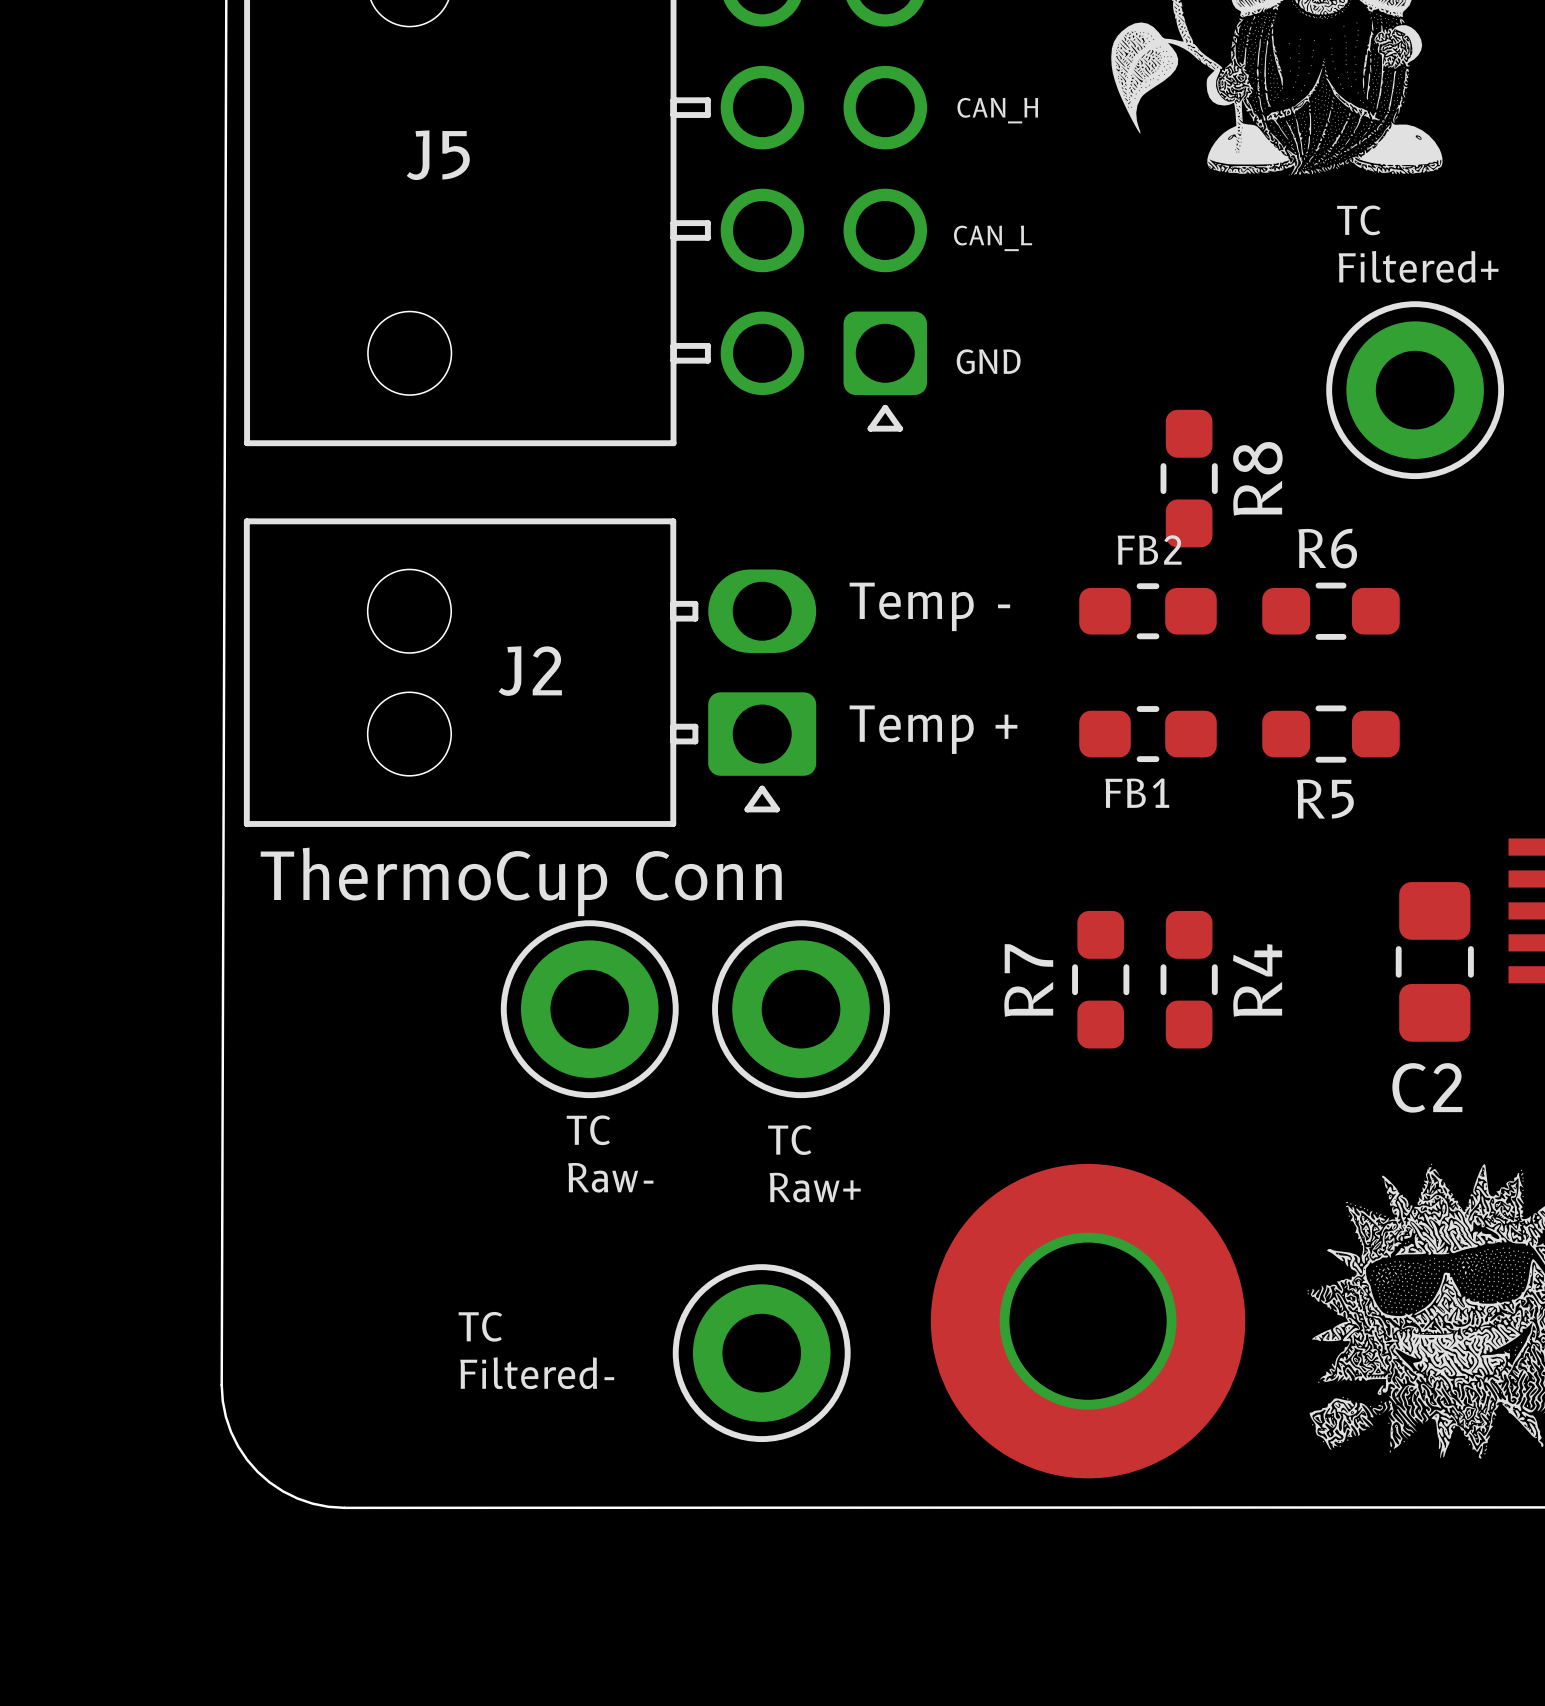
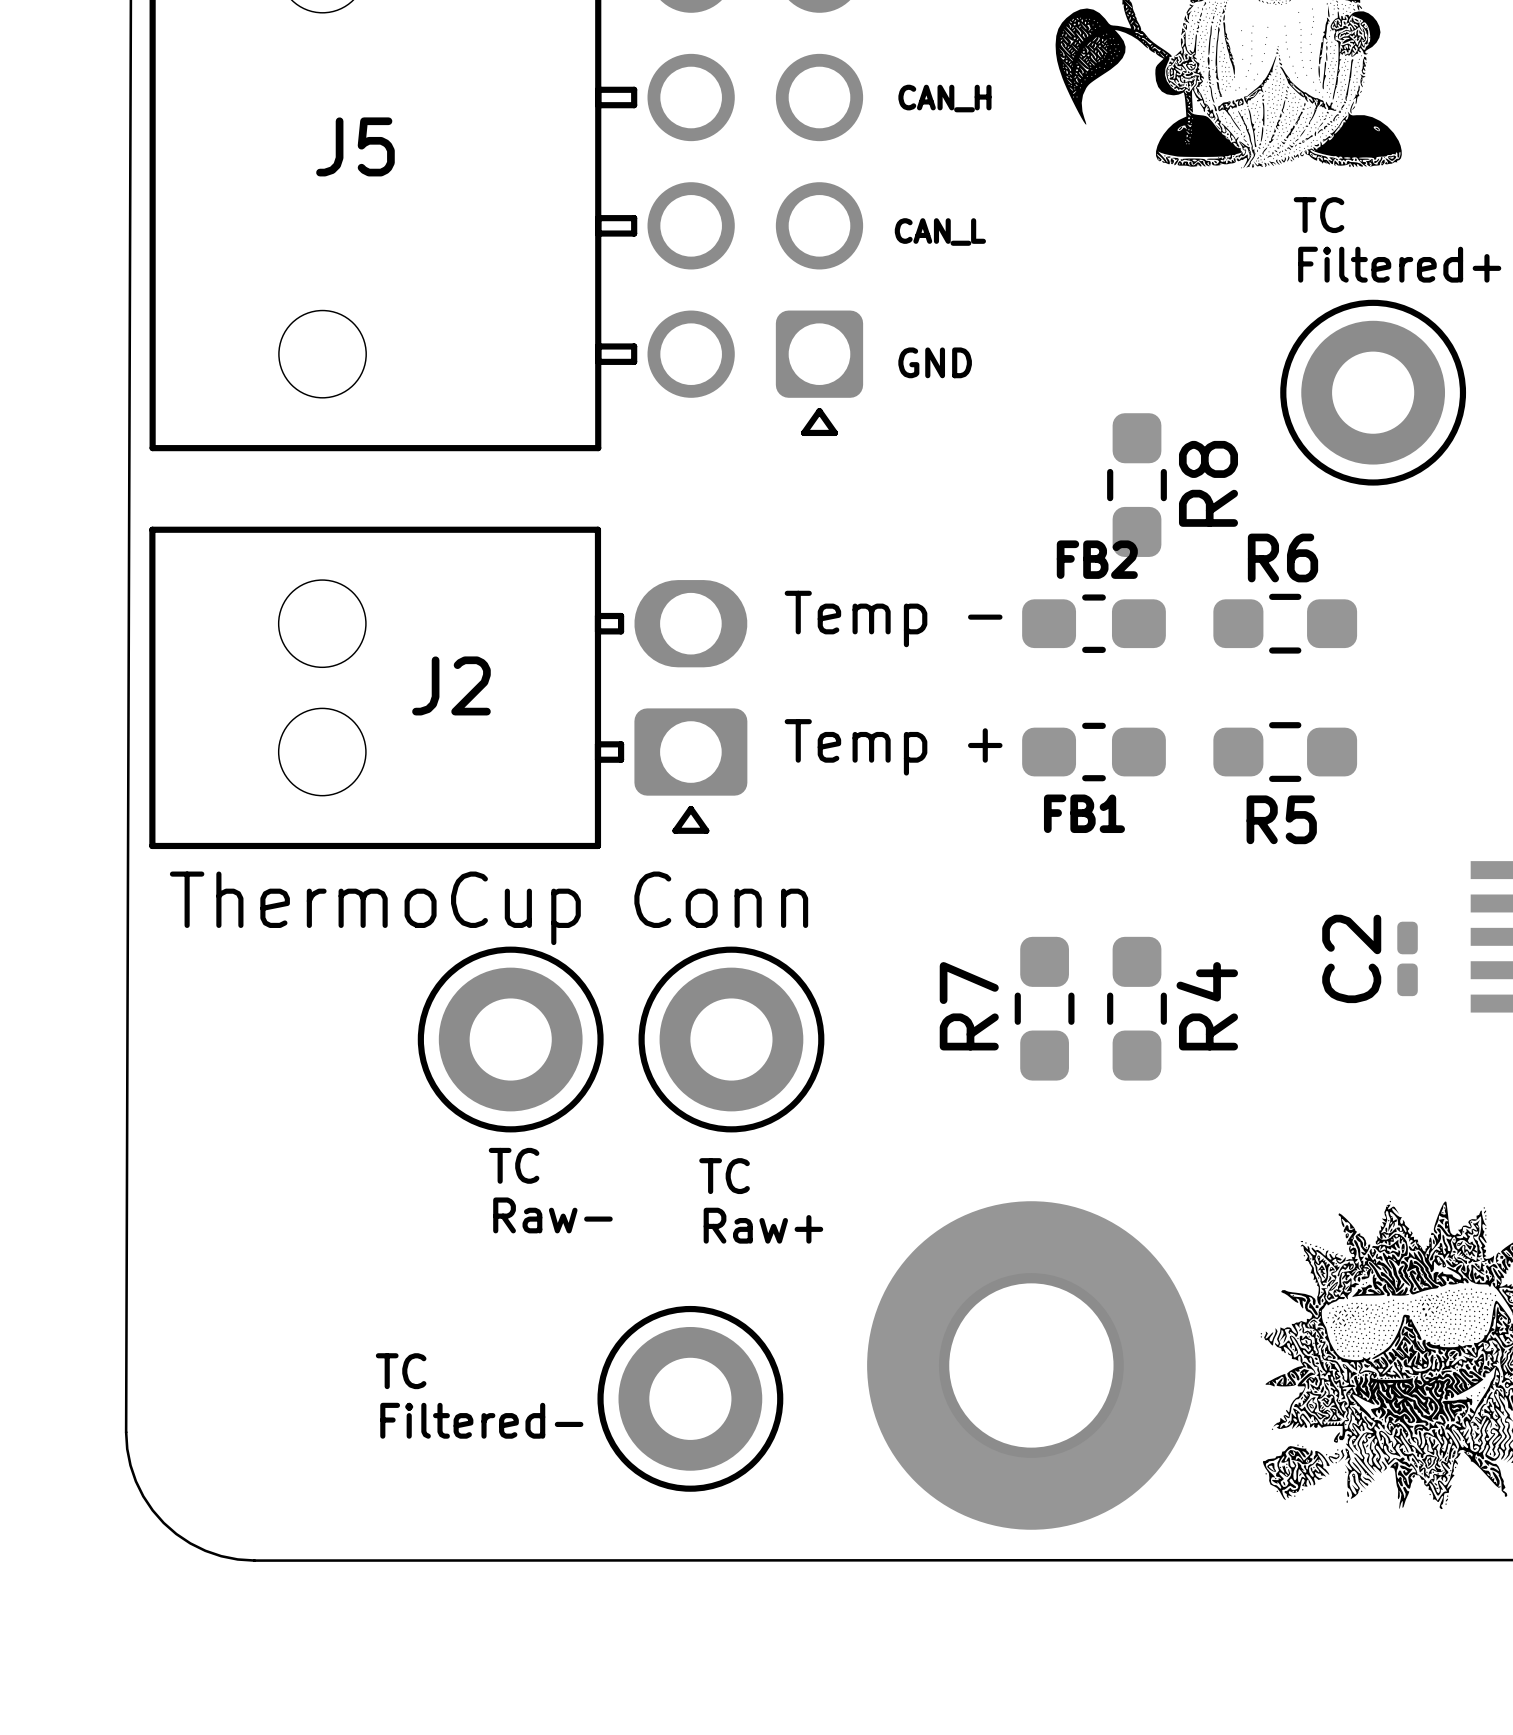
C2 footprint: [1395, 882, 1474, 1042] -> [1397, 921, 1418, 997]
C2 name position: C2 (1427, 1087) -> C2 (1351, 958)

